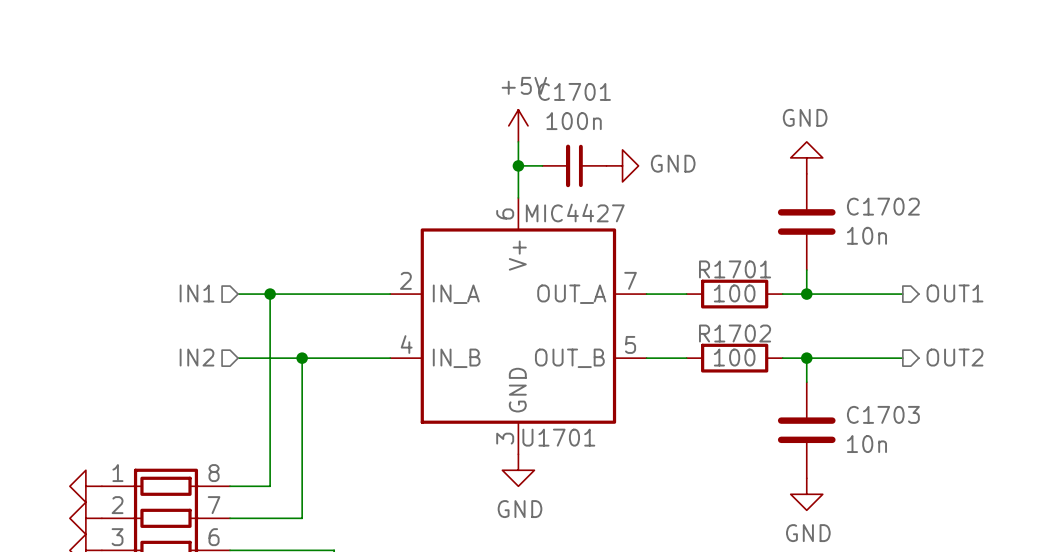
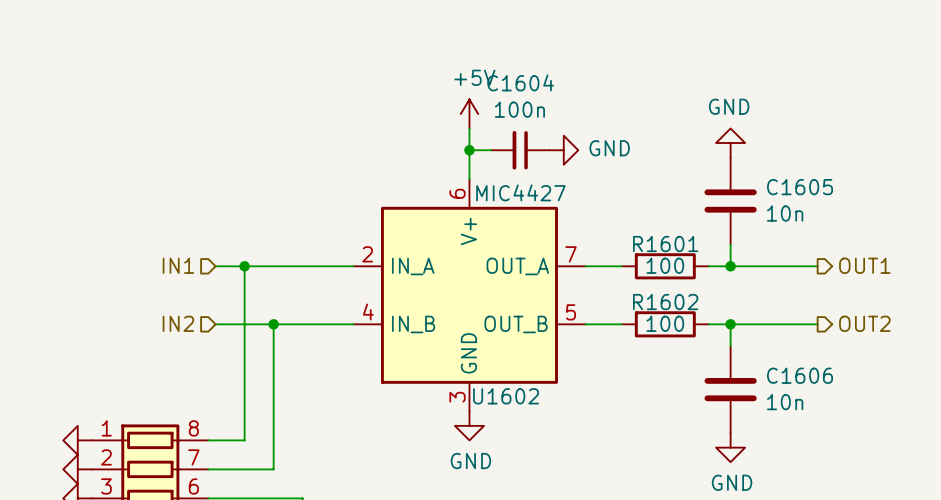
C1701 name: C1701 (574, 91) -> C1604 (520, 82)
C1702 name: C1702 (883, 206) -> C1605 (800, 187)
R1701 name: R1701 (735, 269) -> R1601 (665, 244)
R1702 name: R1702 (735, 333) -> R1602 (665, 302)
C1703 name: C1703 (883, 414) -> C1606 (800, 375)
U1701 name: U1701 (558, 437) -> U1602 (506, 396)

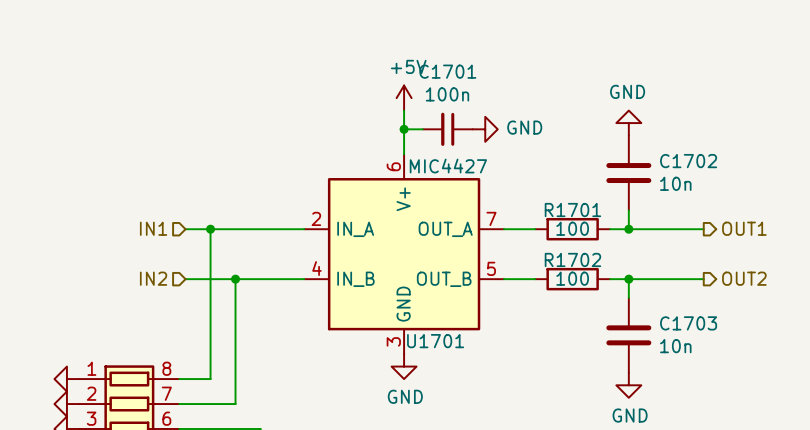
C1604 name: C1604 (520, 82) -> C1701 (447, 71)
C1605 name: C1605 (800, 187) -> C1702 (688, 161)
R1601 name: R1601 (665, 244) -> R1701 (572, 210)
R1602 name: R1602 (665, 302) -> R1702 (572, 259)
C1606 name: C1606 (800, 375) -> C1703 (688, 323)
U1602 name: U1602 (506, 396) -> U1701 (435, 341)

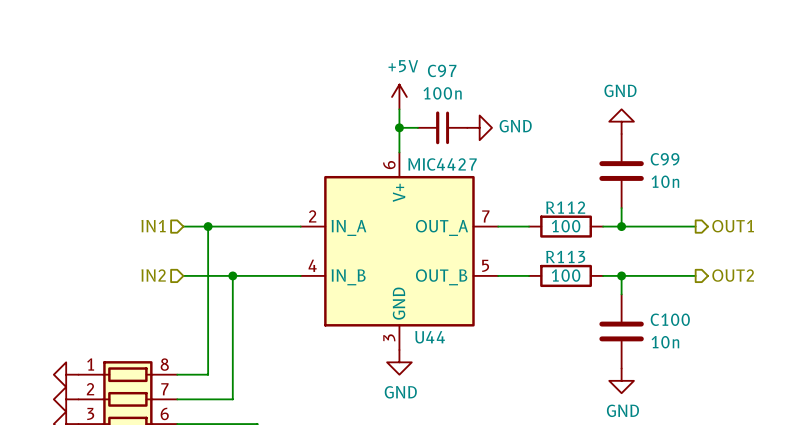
C1701 name: C1701 (447, 71) -> C97 (442, 70)
C1702 name: C1702 (688, 161) -> C99 (665, 159)
R1701 name: R1701 (572, 210) -> R112 (565, 207)
R1702 name: R1702 (572, 259) -> R113 (565, 256)
C1703 name: C1703 (688, 323) -> C100 (670, 319)
U1701 name: U1701 (435, 341) -> U44 (430, 337)

